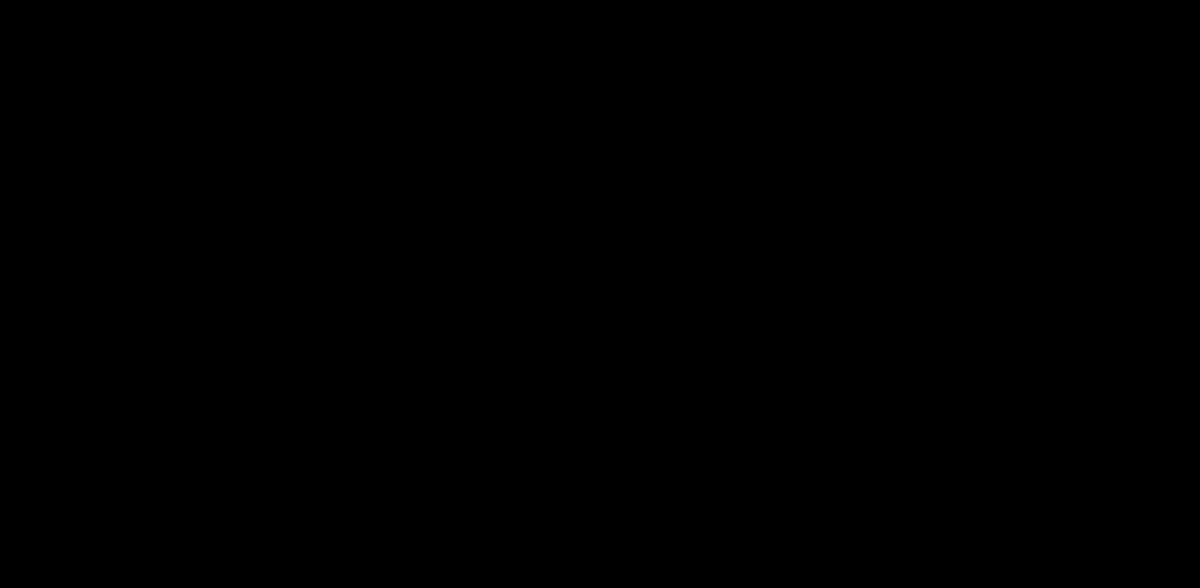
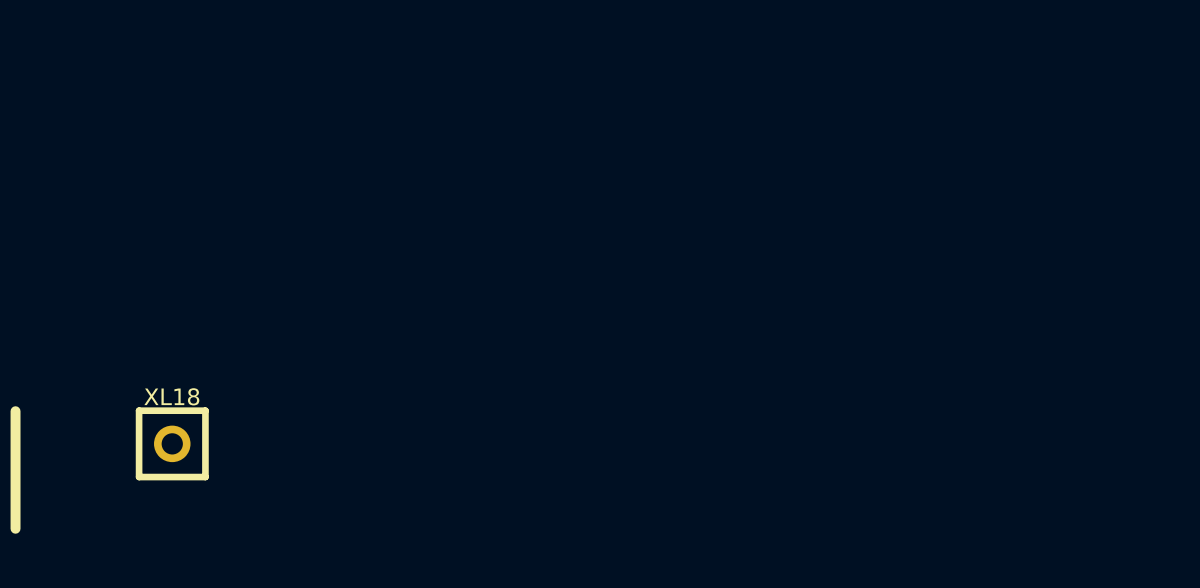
line: none -> (15, 411) (15, 528)
XL18: none -> (172, 443)

